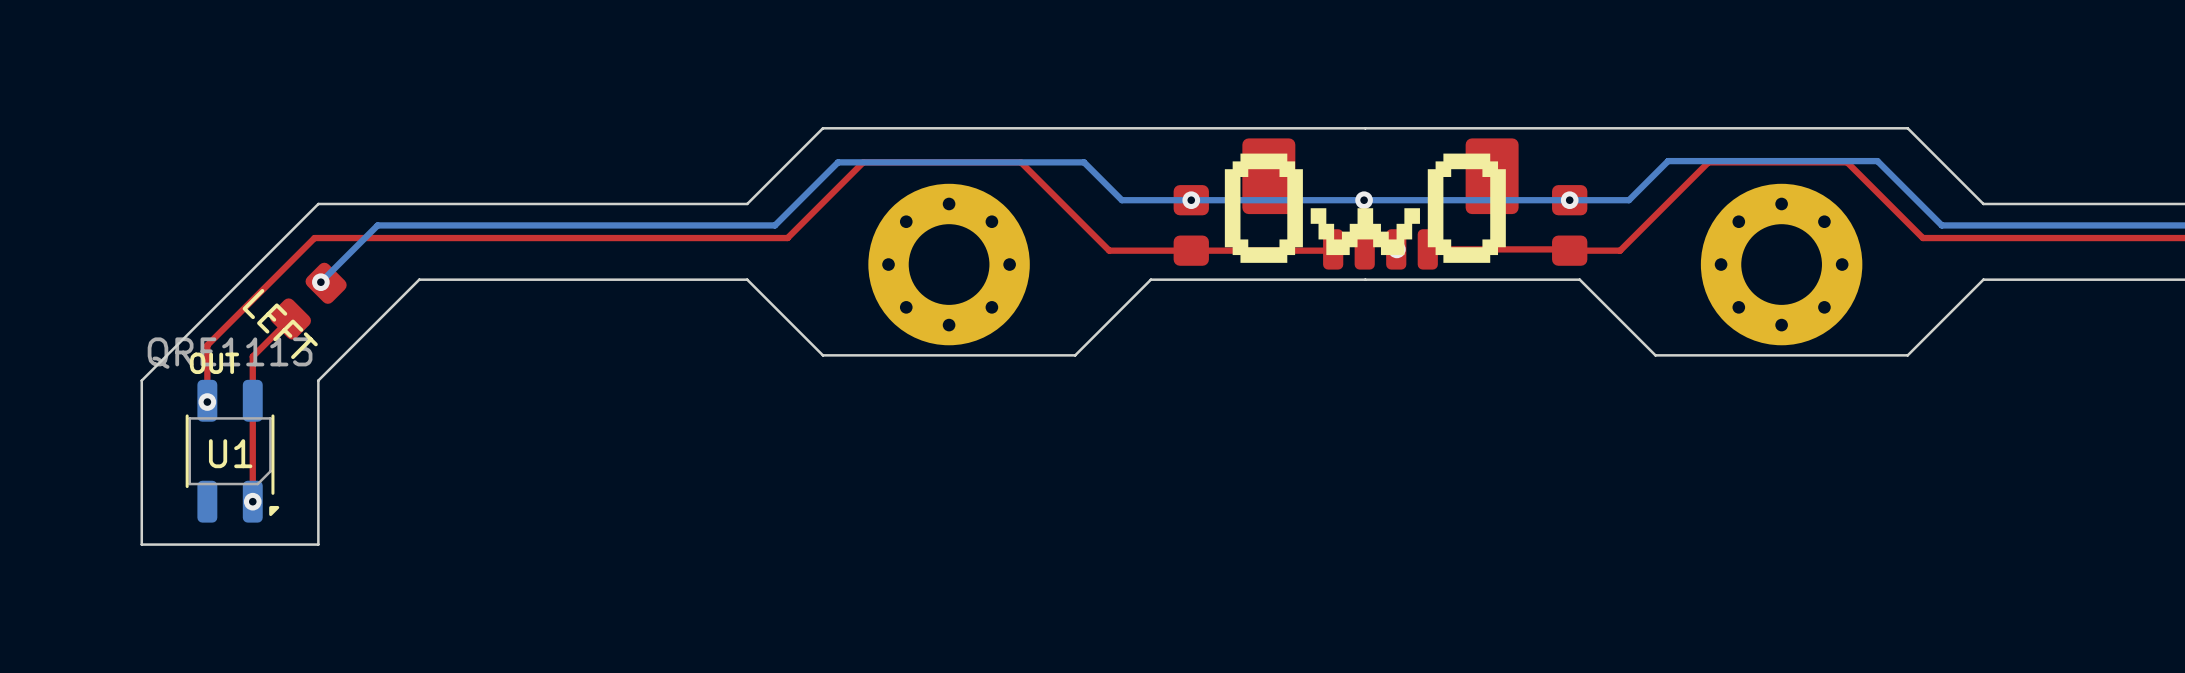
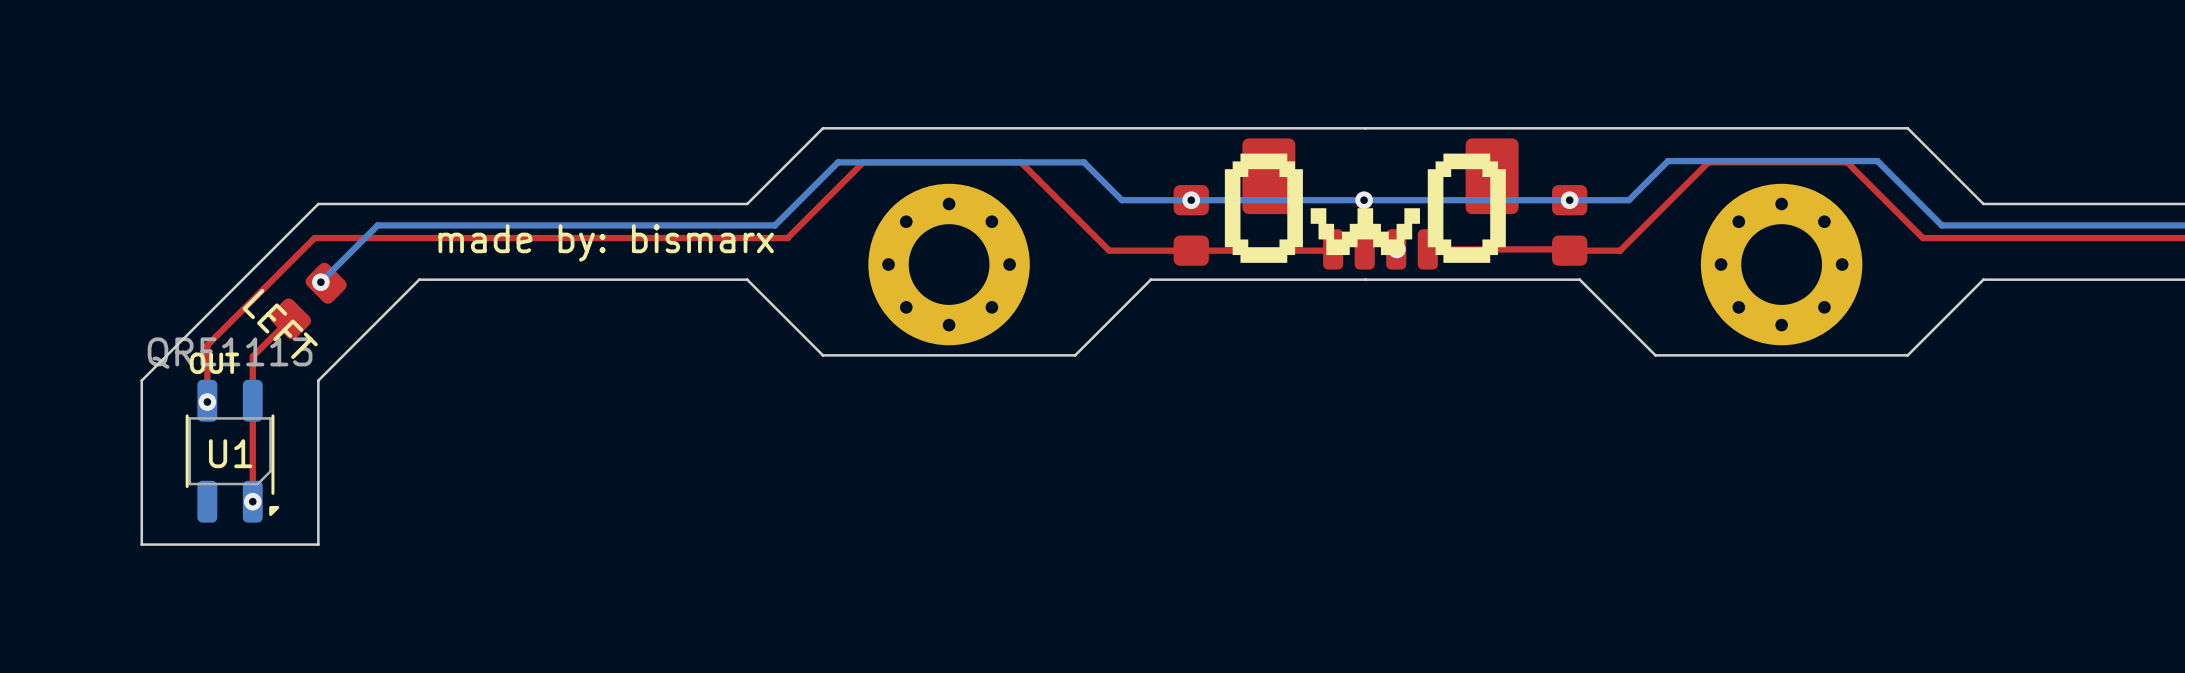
text: none -> made by: bismarx (606, 242)

